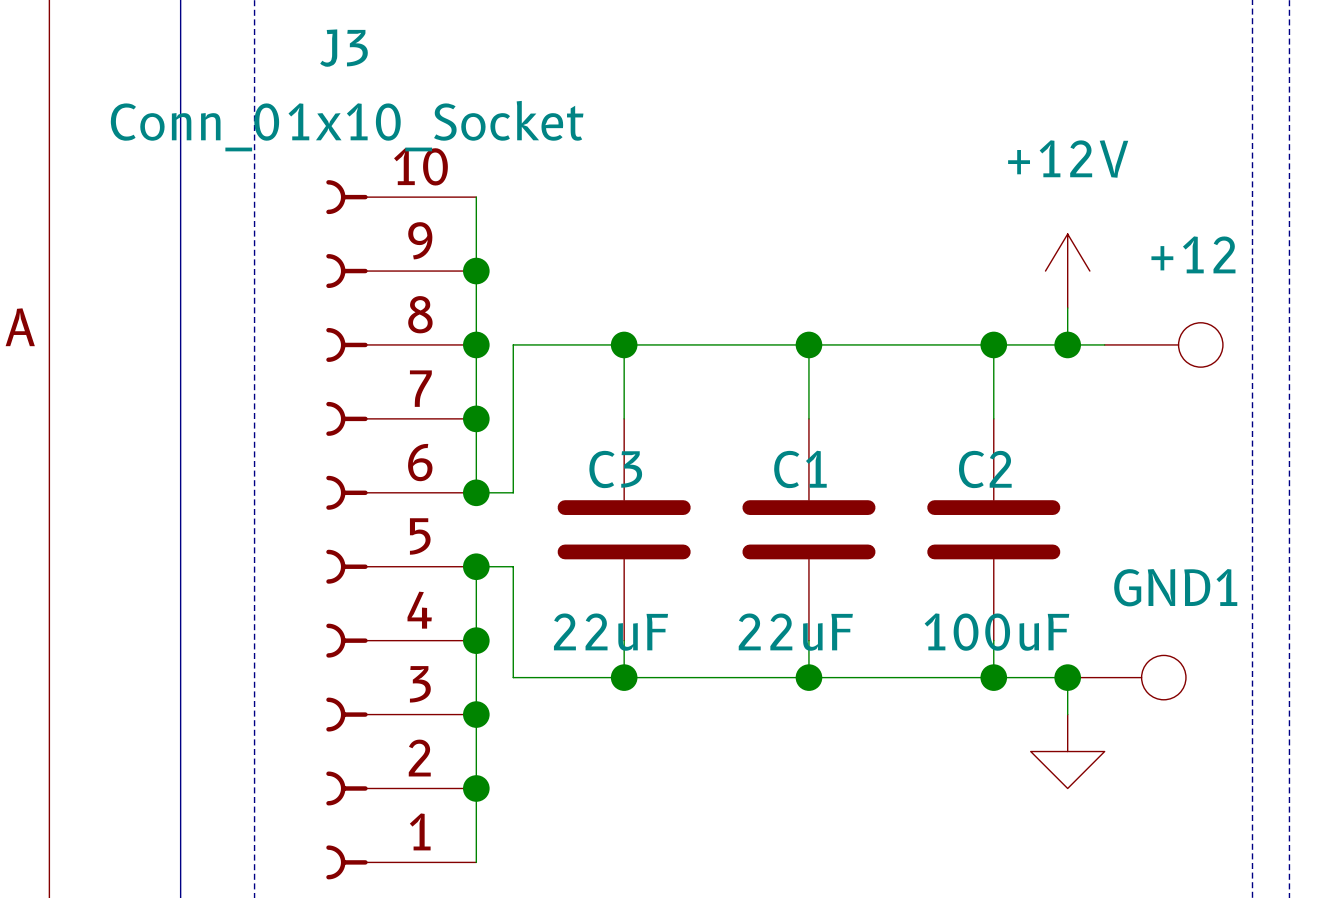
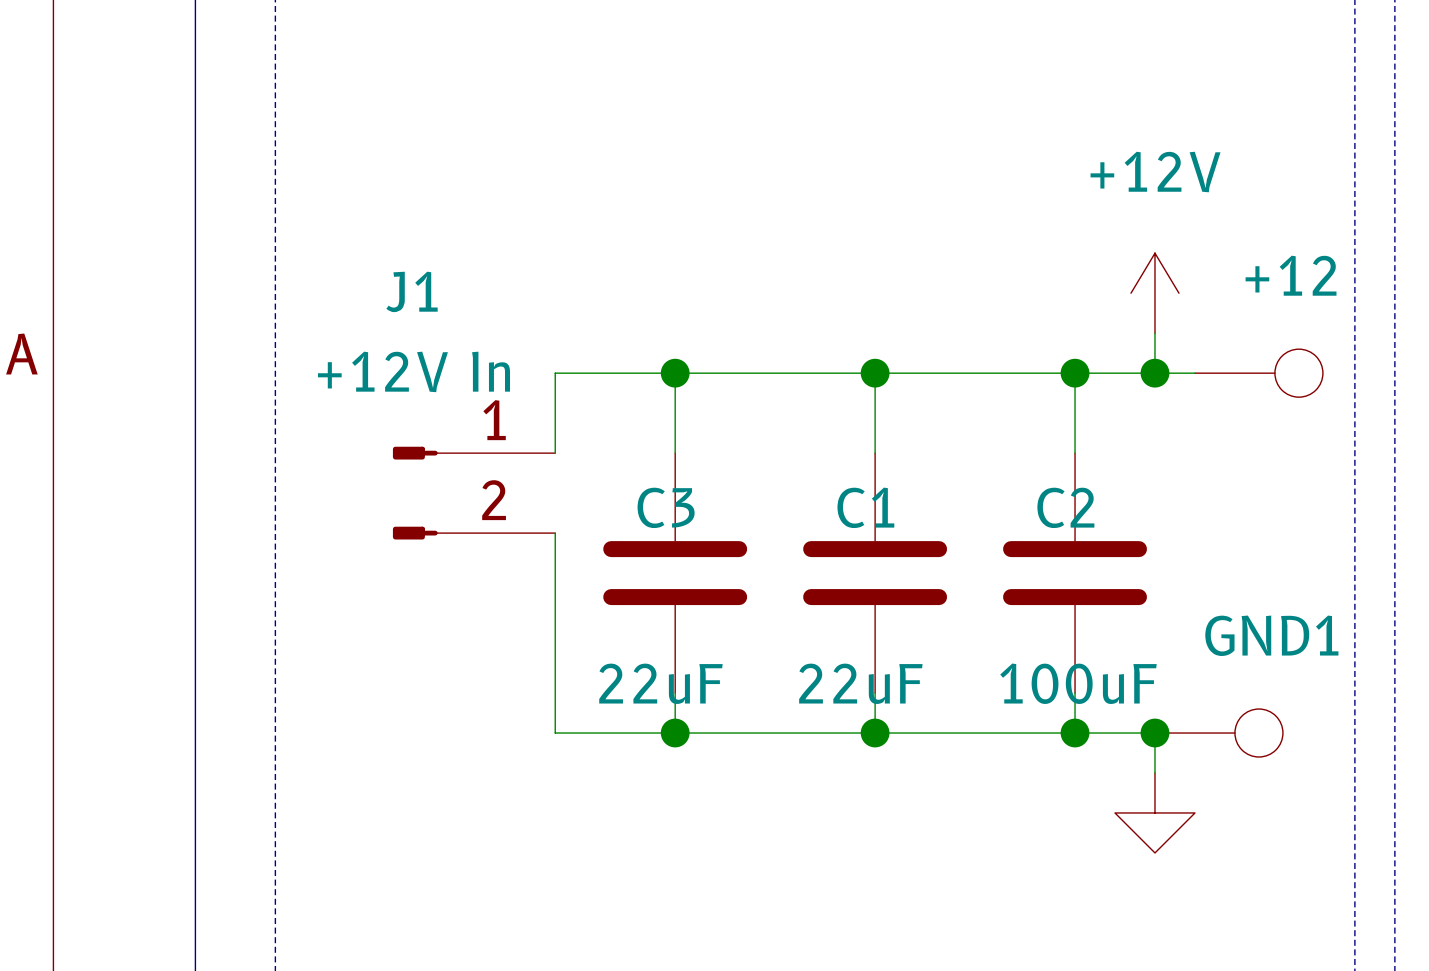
wire: (476, 197) (476, 492) (513, 492) (513, 418) -> none
junction: (476, 271) -> none
junction: (476, 344) -> none
junction: (476, 418) -> none
J1: none -> +12V In (474, 493)
junction: (476, 492) -> none
J3: Conn_01x10_Socket (401, 529) -> none
junction: (476, 566) -> none
wire: (513, 566) (476, 566) (476, 862) -> (555, 613) (555, 533)
junction: (476, 640) -> none
junction: (476, 714) -> none
junction: (476, 788) -> none

